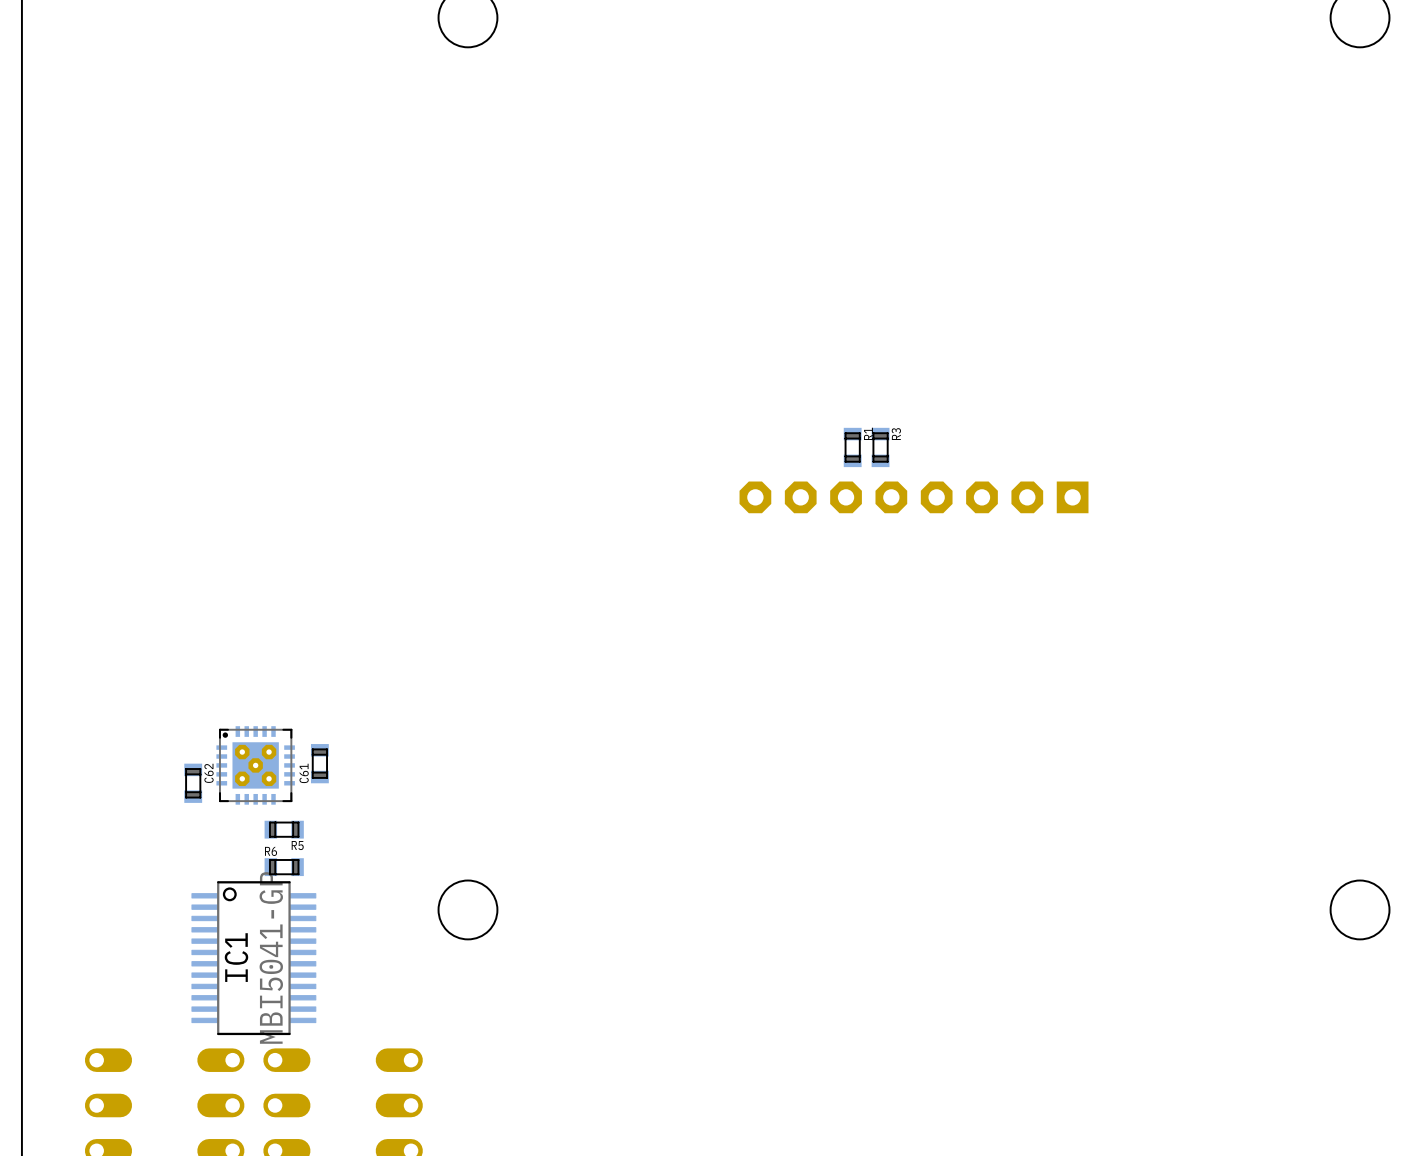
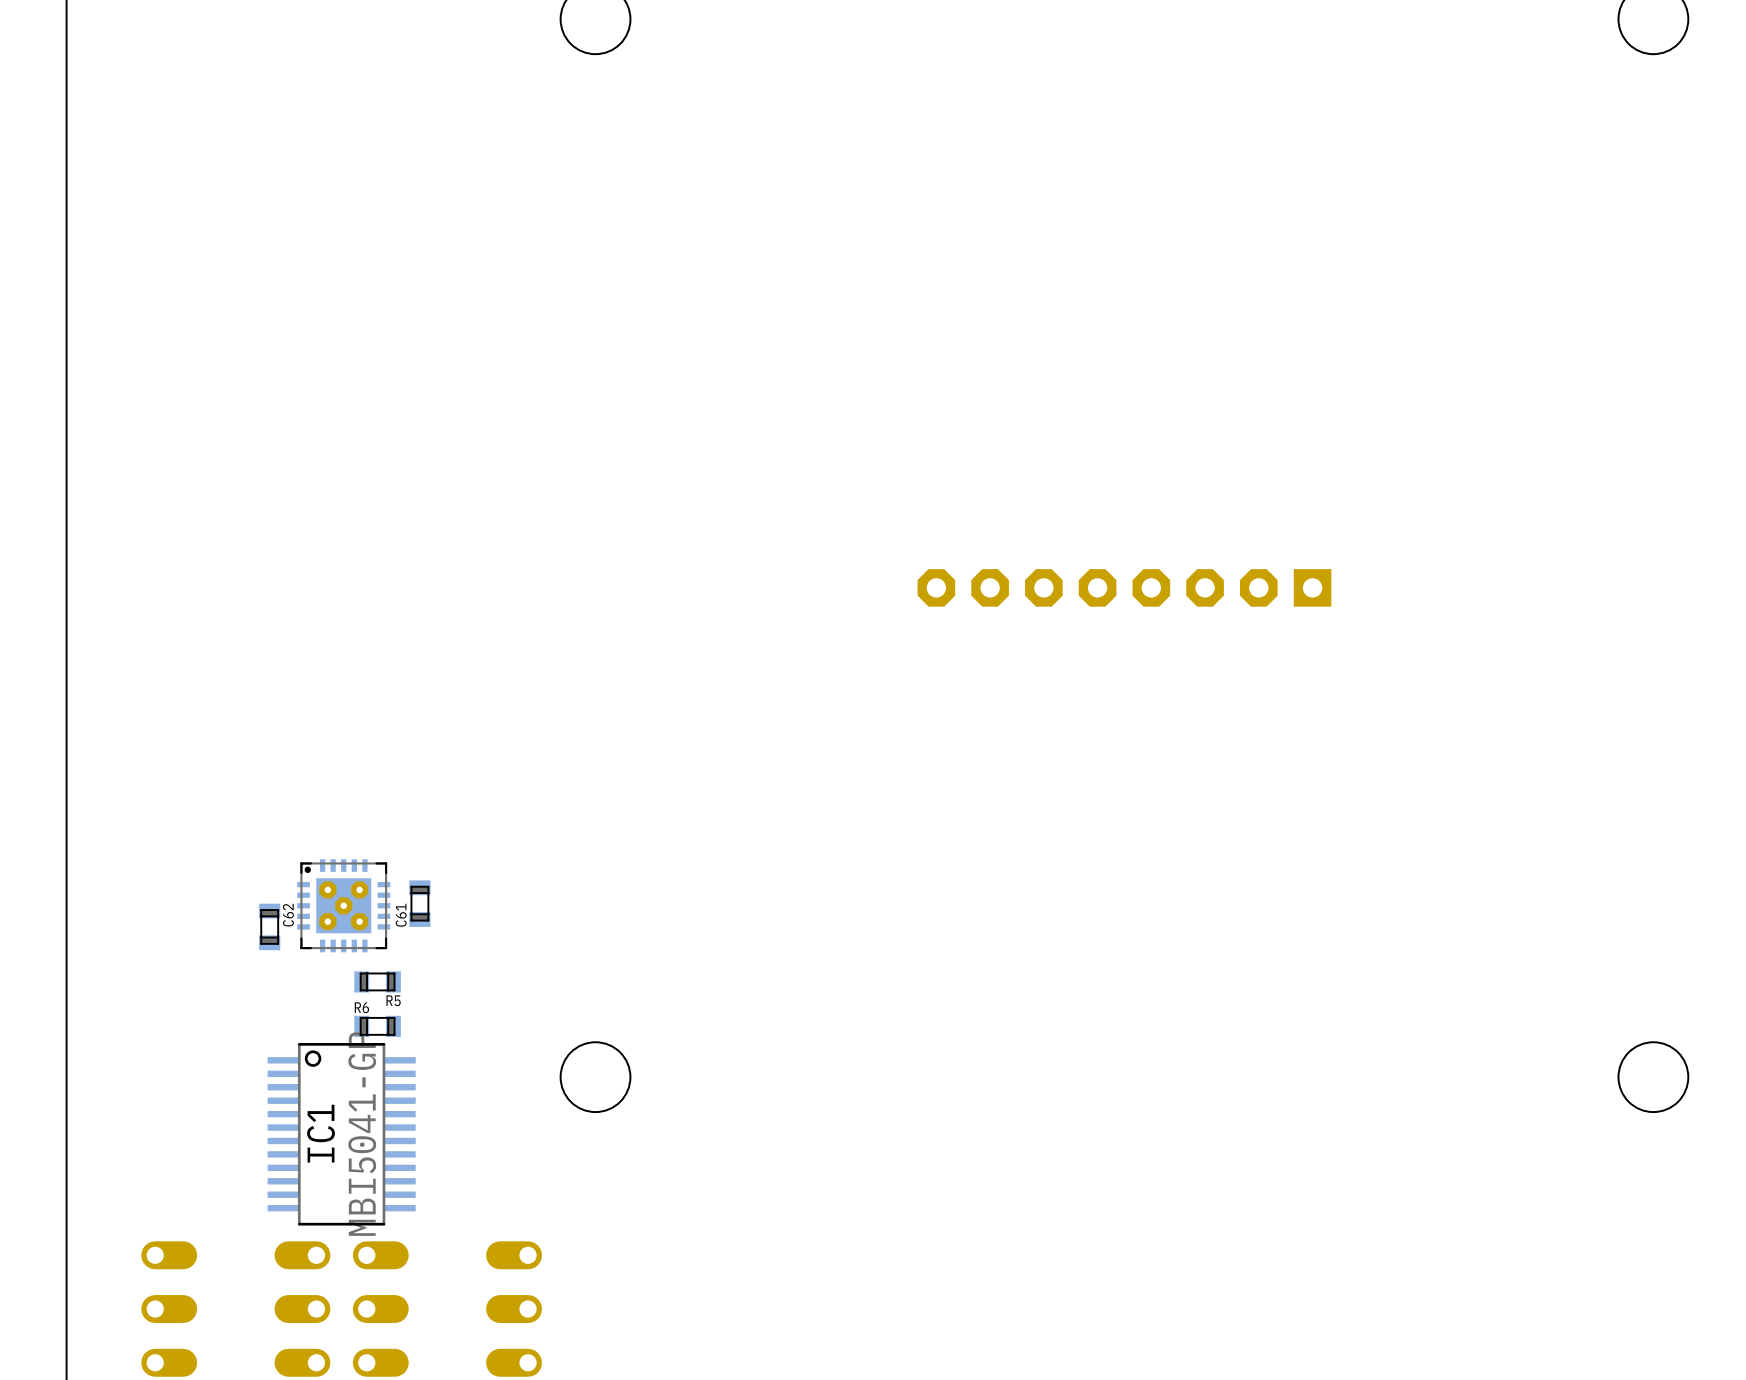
R1: (852, 447) -> none
R3: (880, 447) -> none

